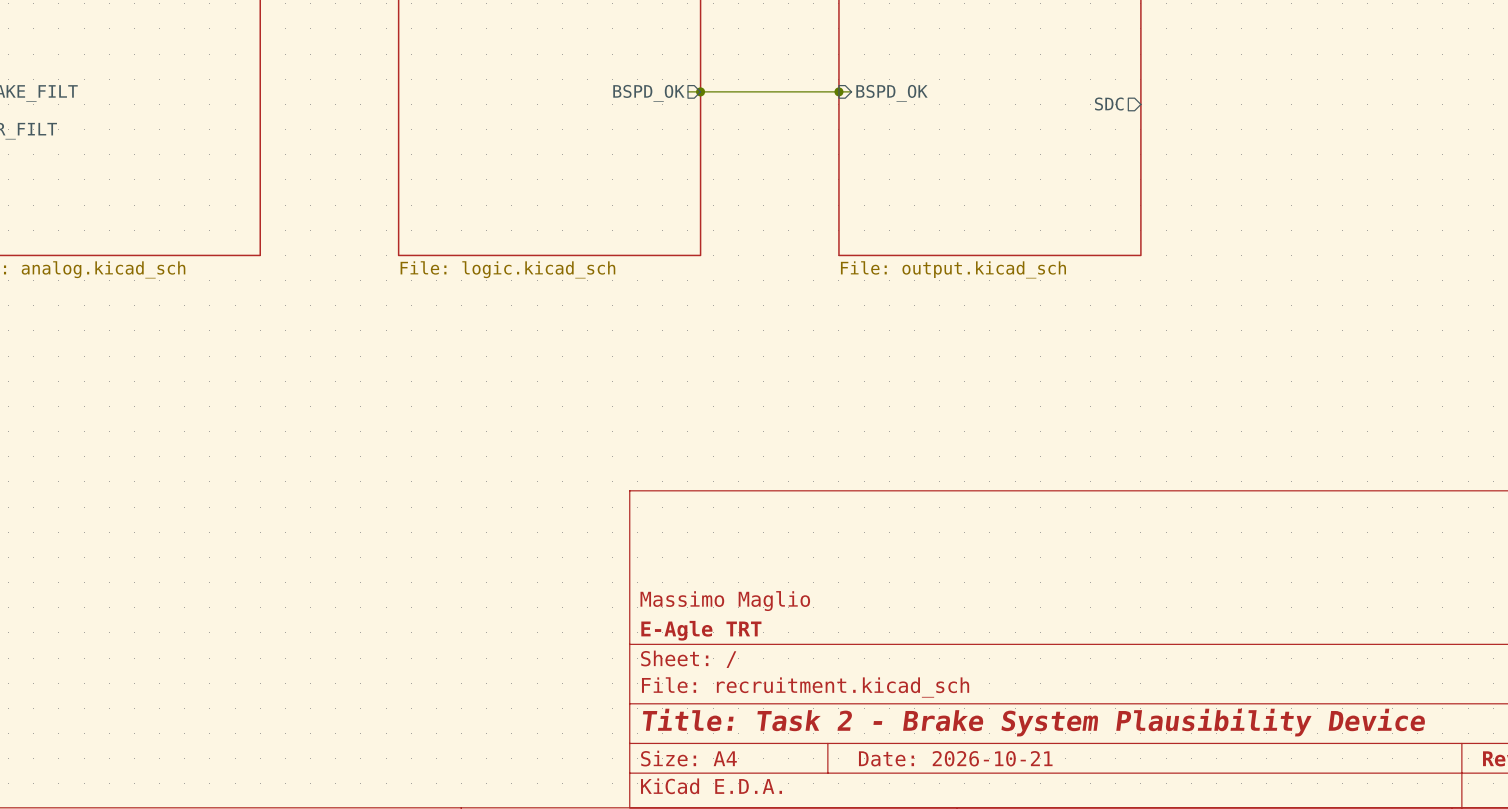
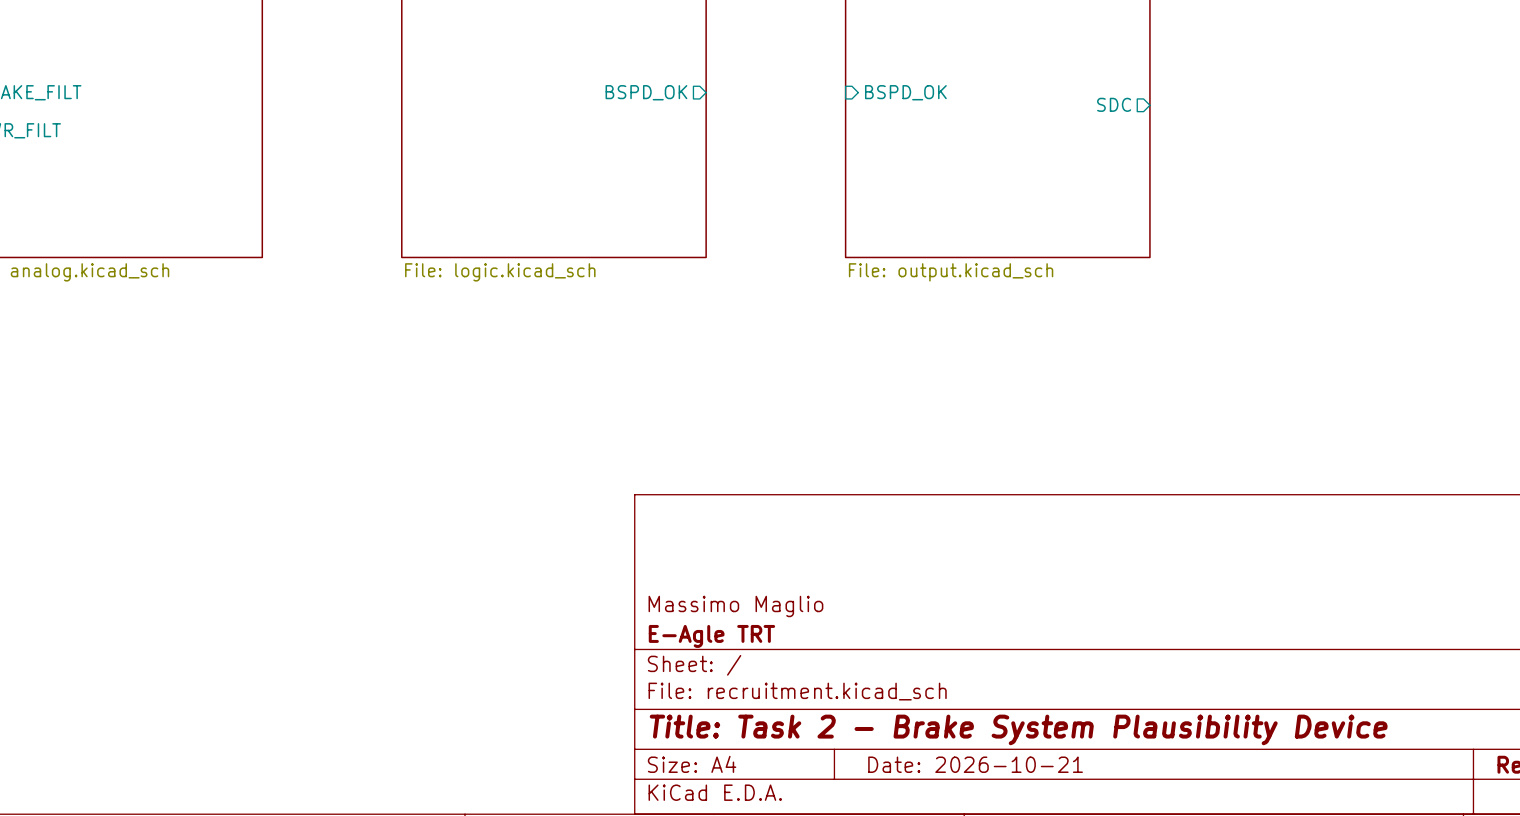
wire: (687, 91) (851, 91) -> none
junction: (700, 91) -> none
junction: (838, 91) -> none

